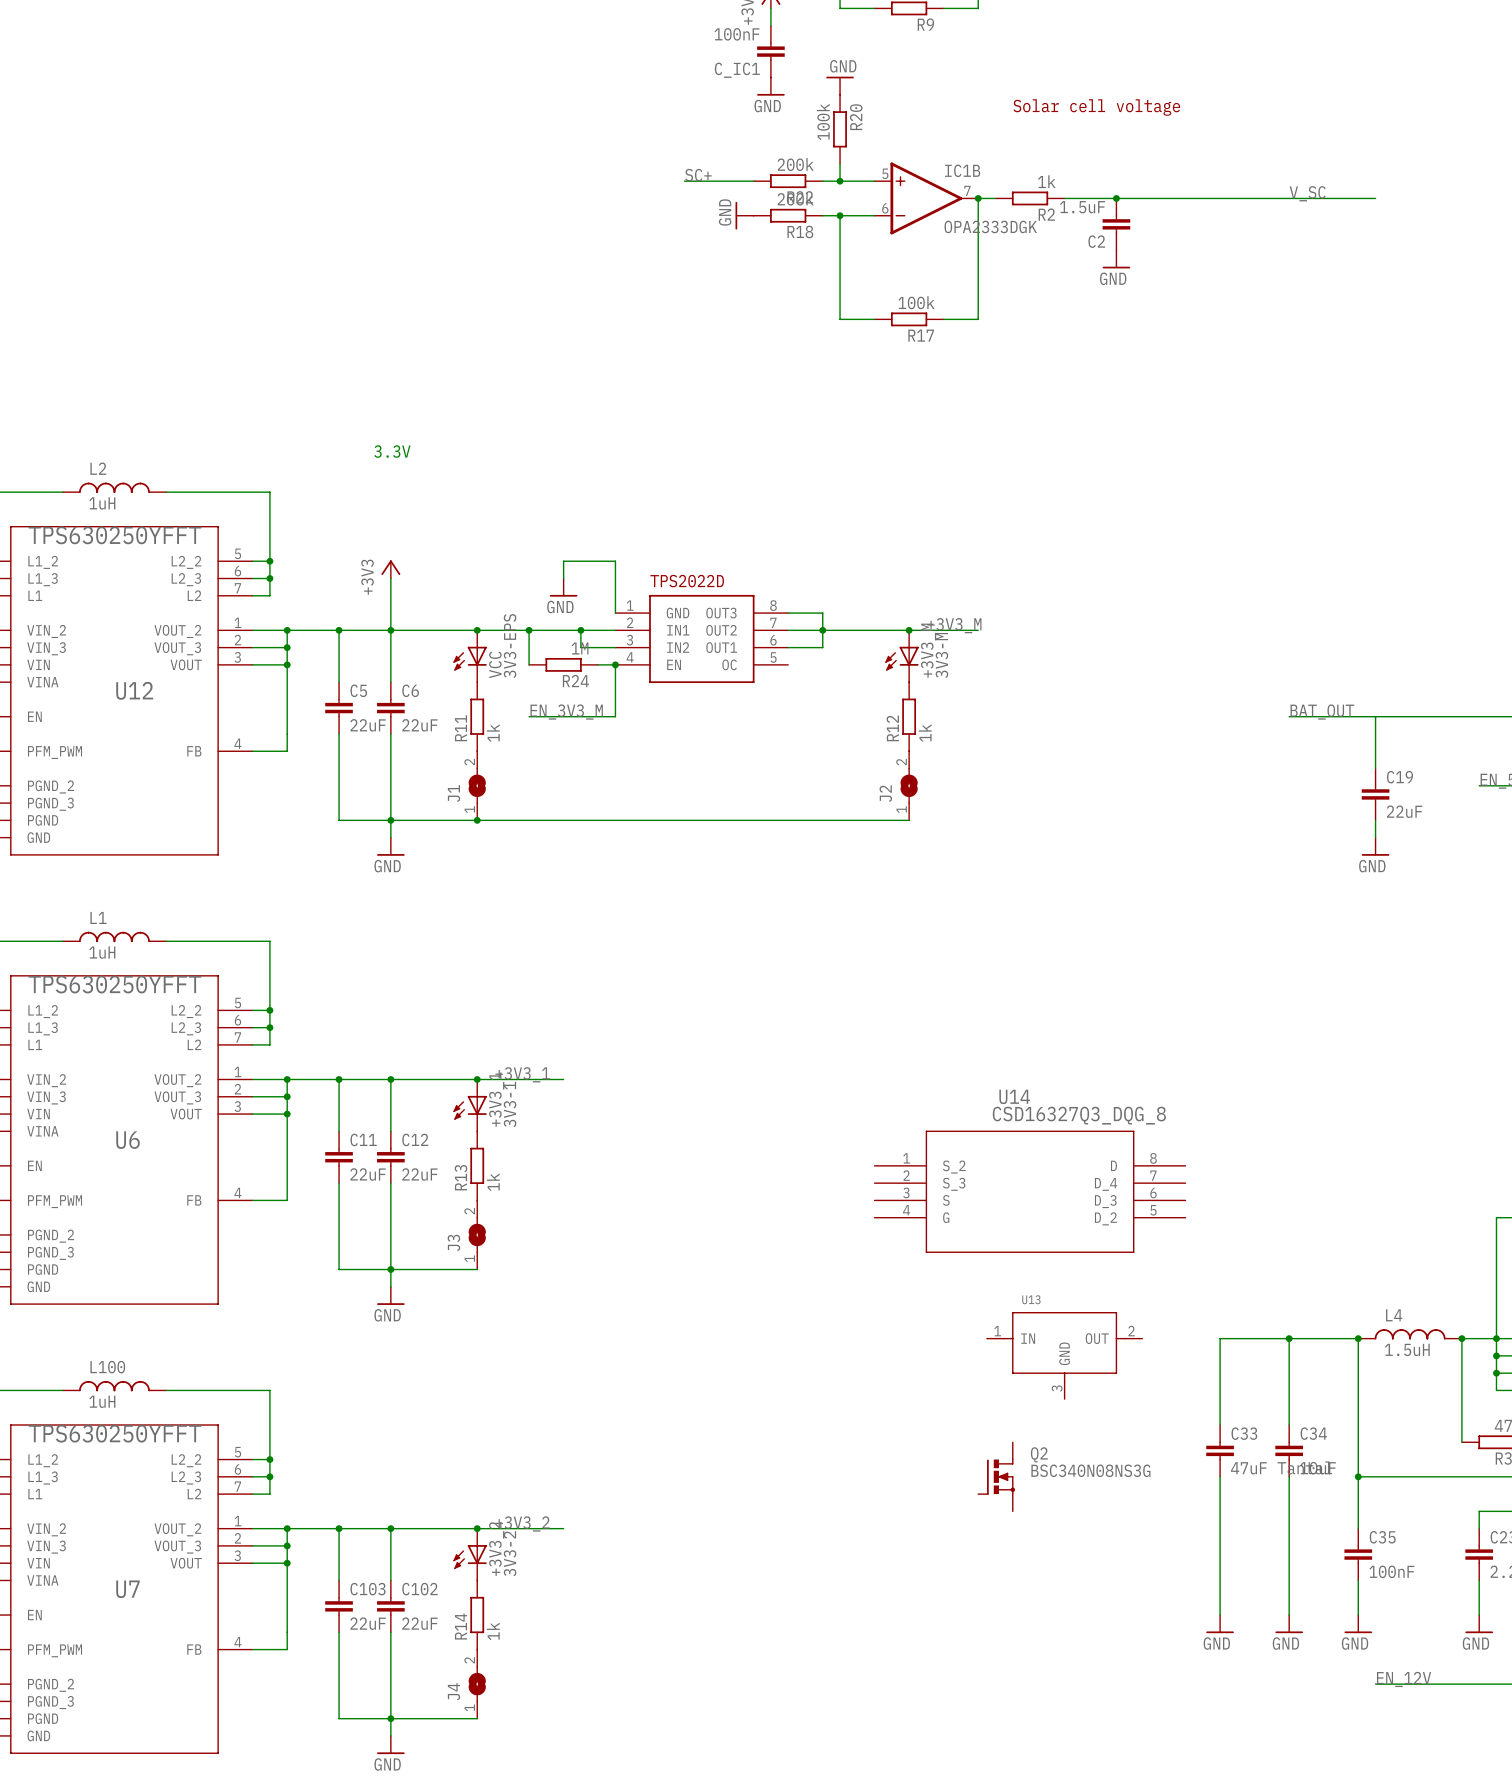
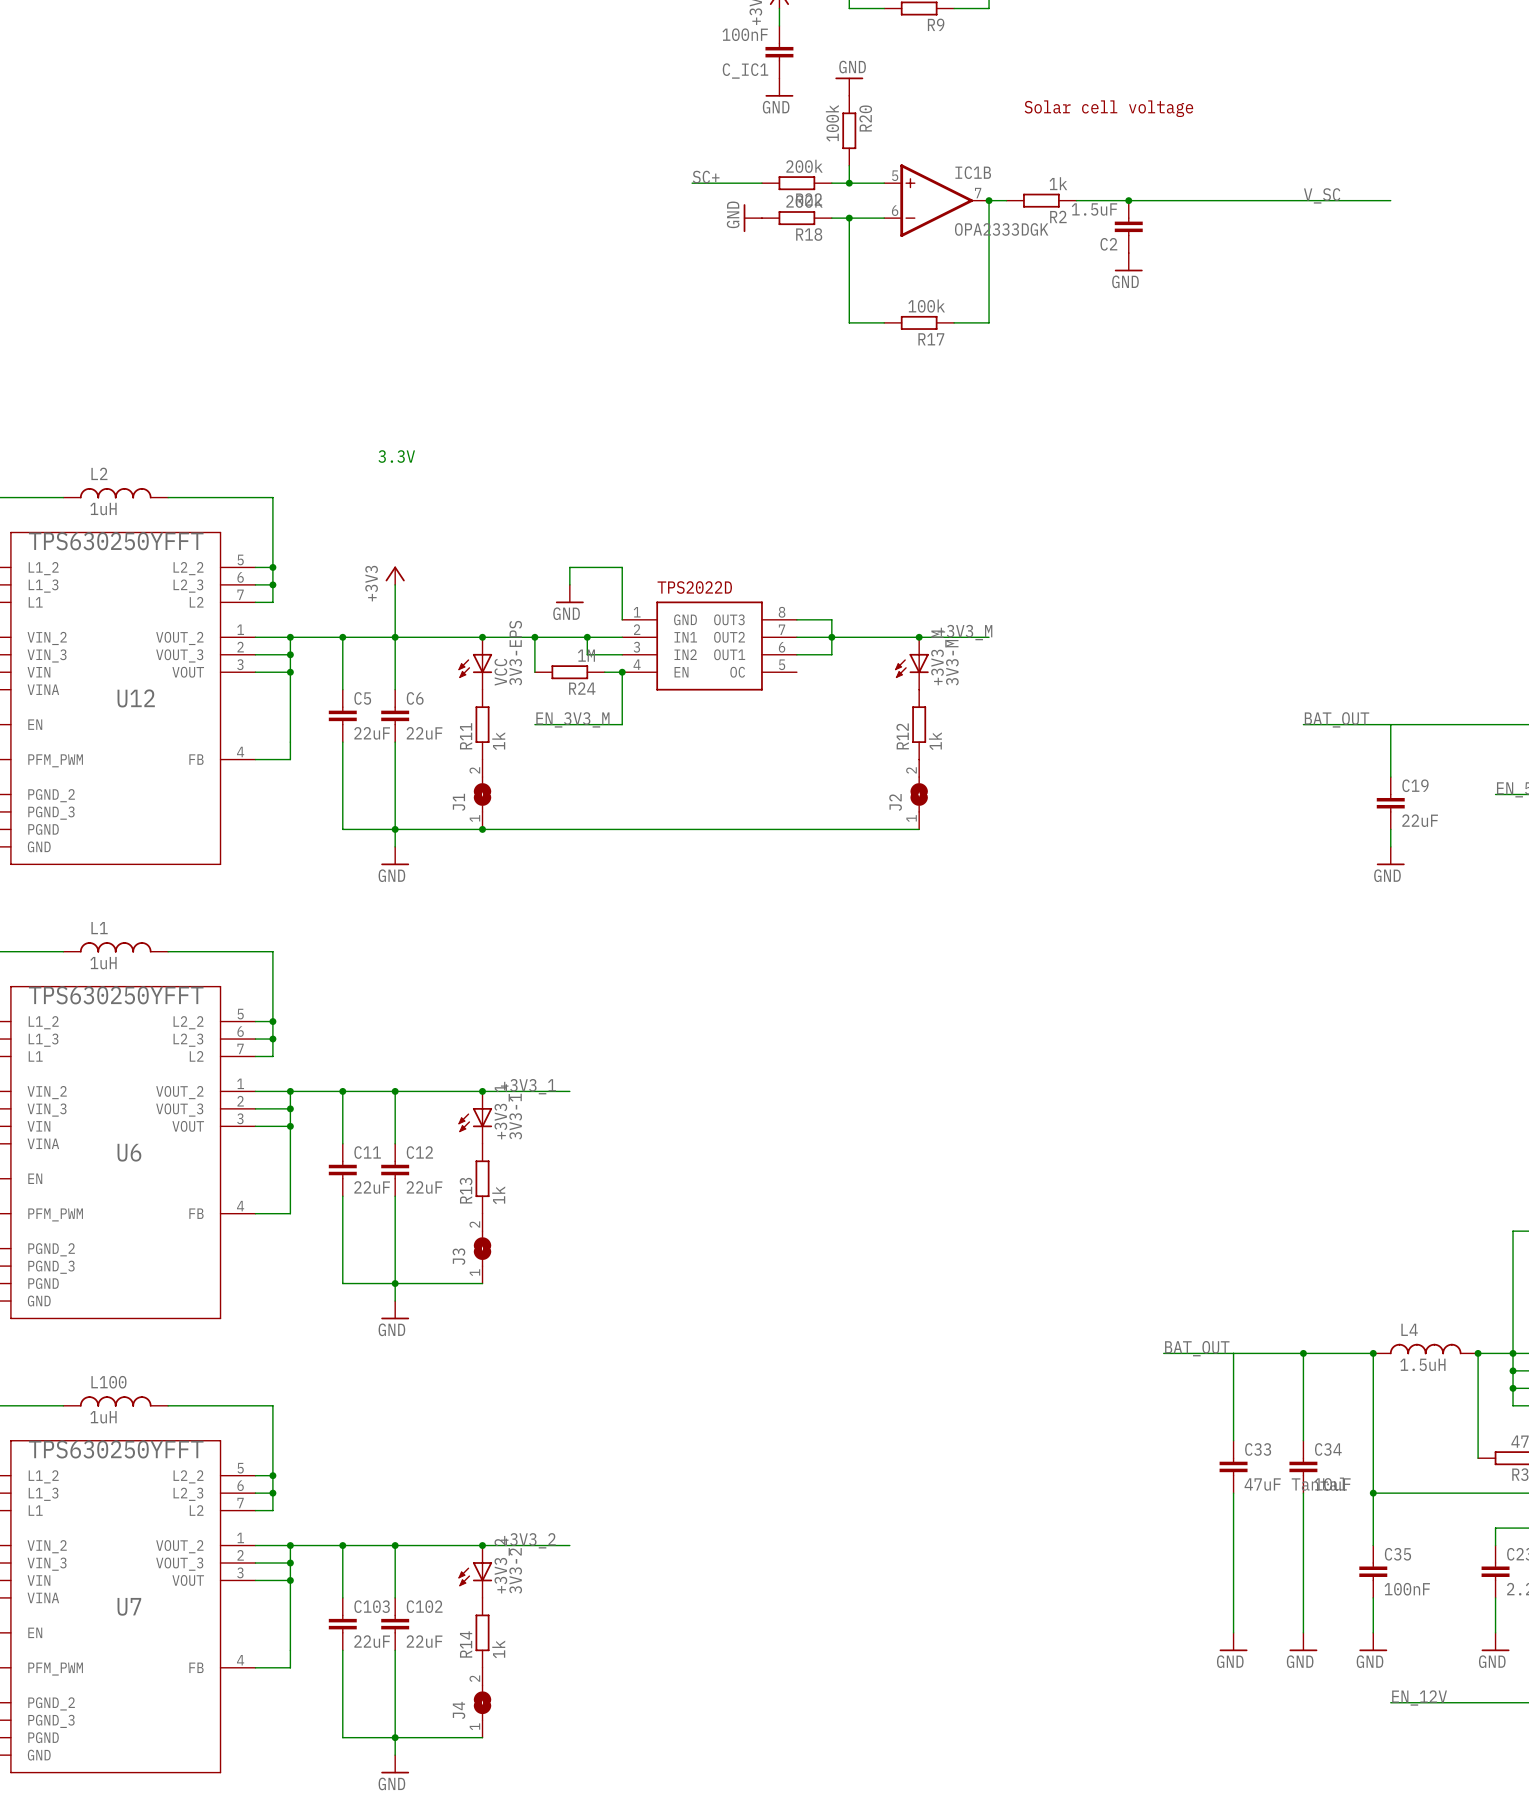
U14: CSD16327Q3_DQG_8 (1030, 1191) -> none
label: none -> BAT_OUT (1197, 1348)
wire: none -> (1163, 1353) (1233, 1353)
U13: (1064, 1355) -> none
Q2: BSC340N08NS3G (996, 1476) -> none

